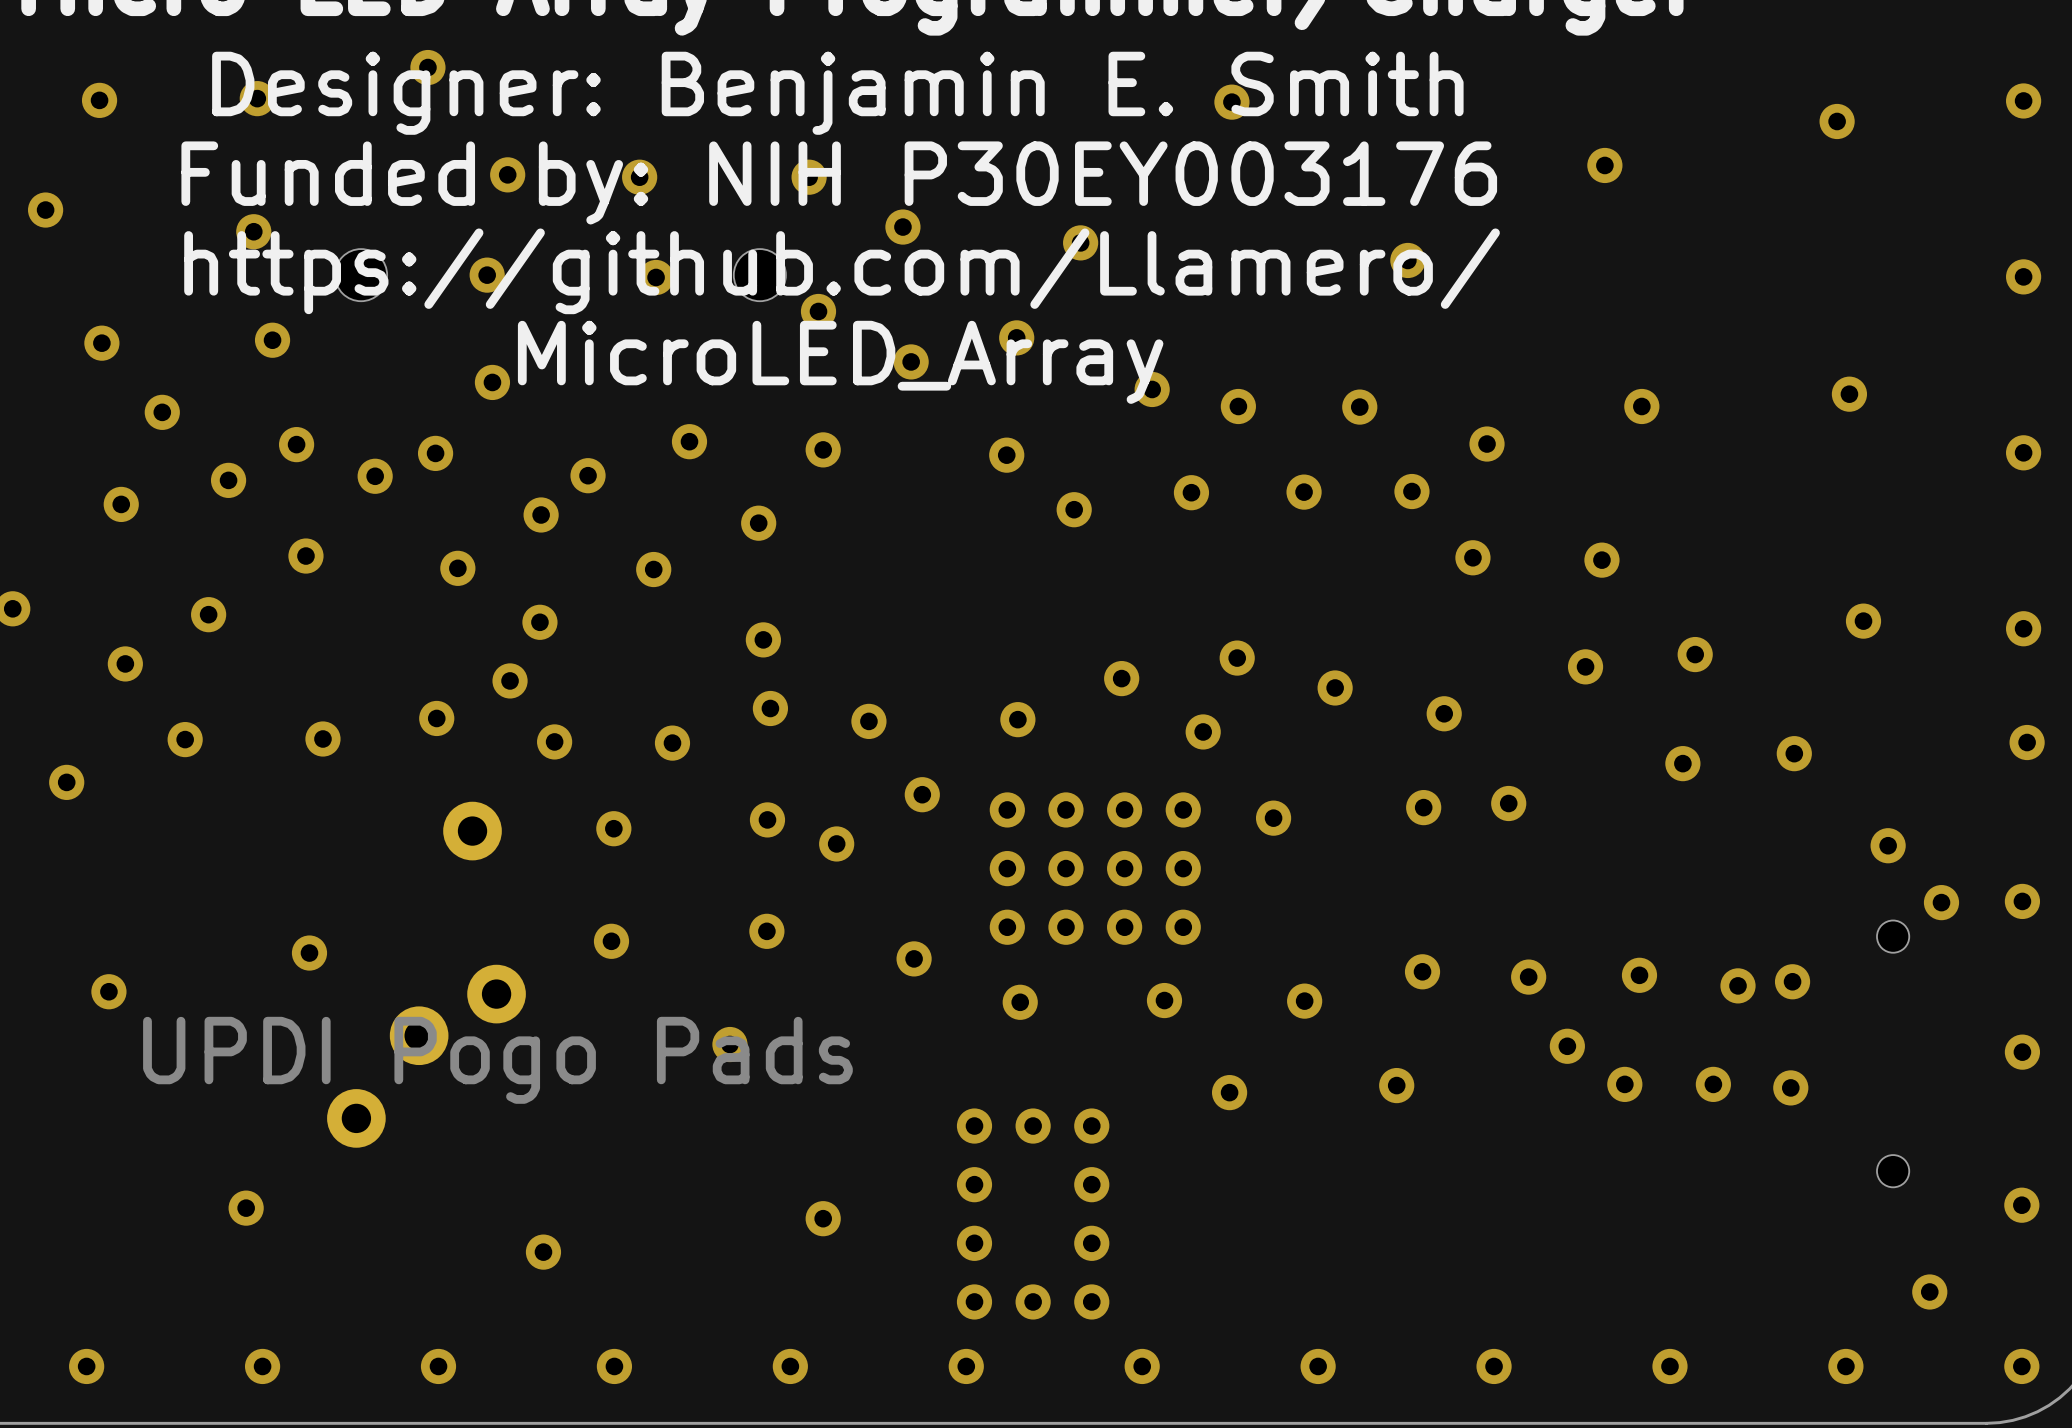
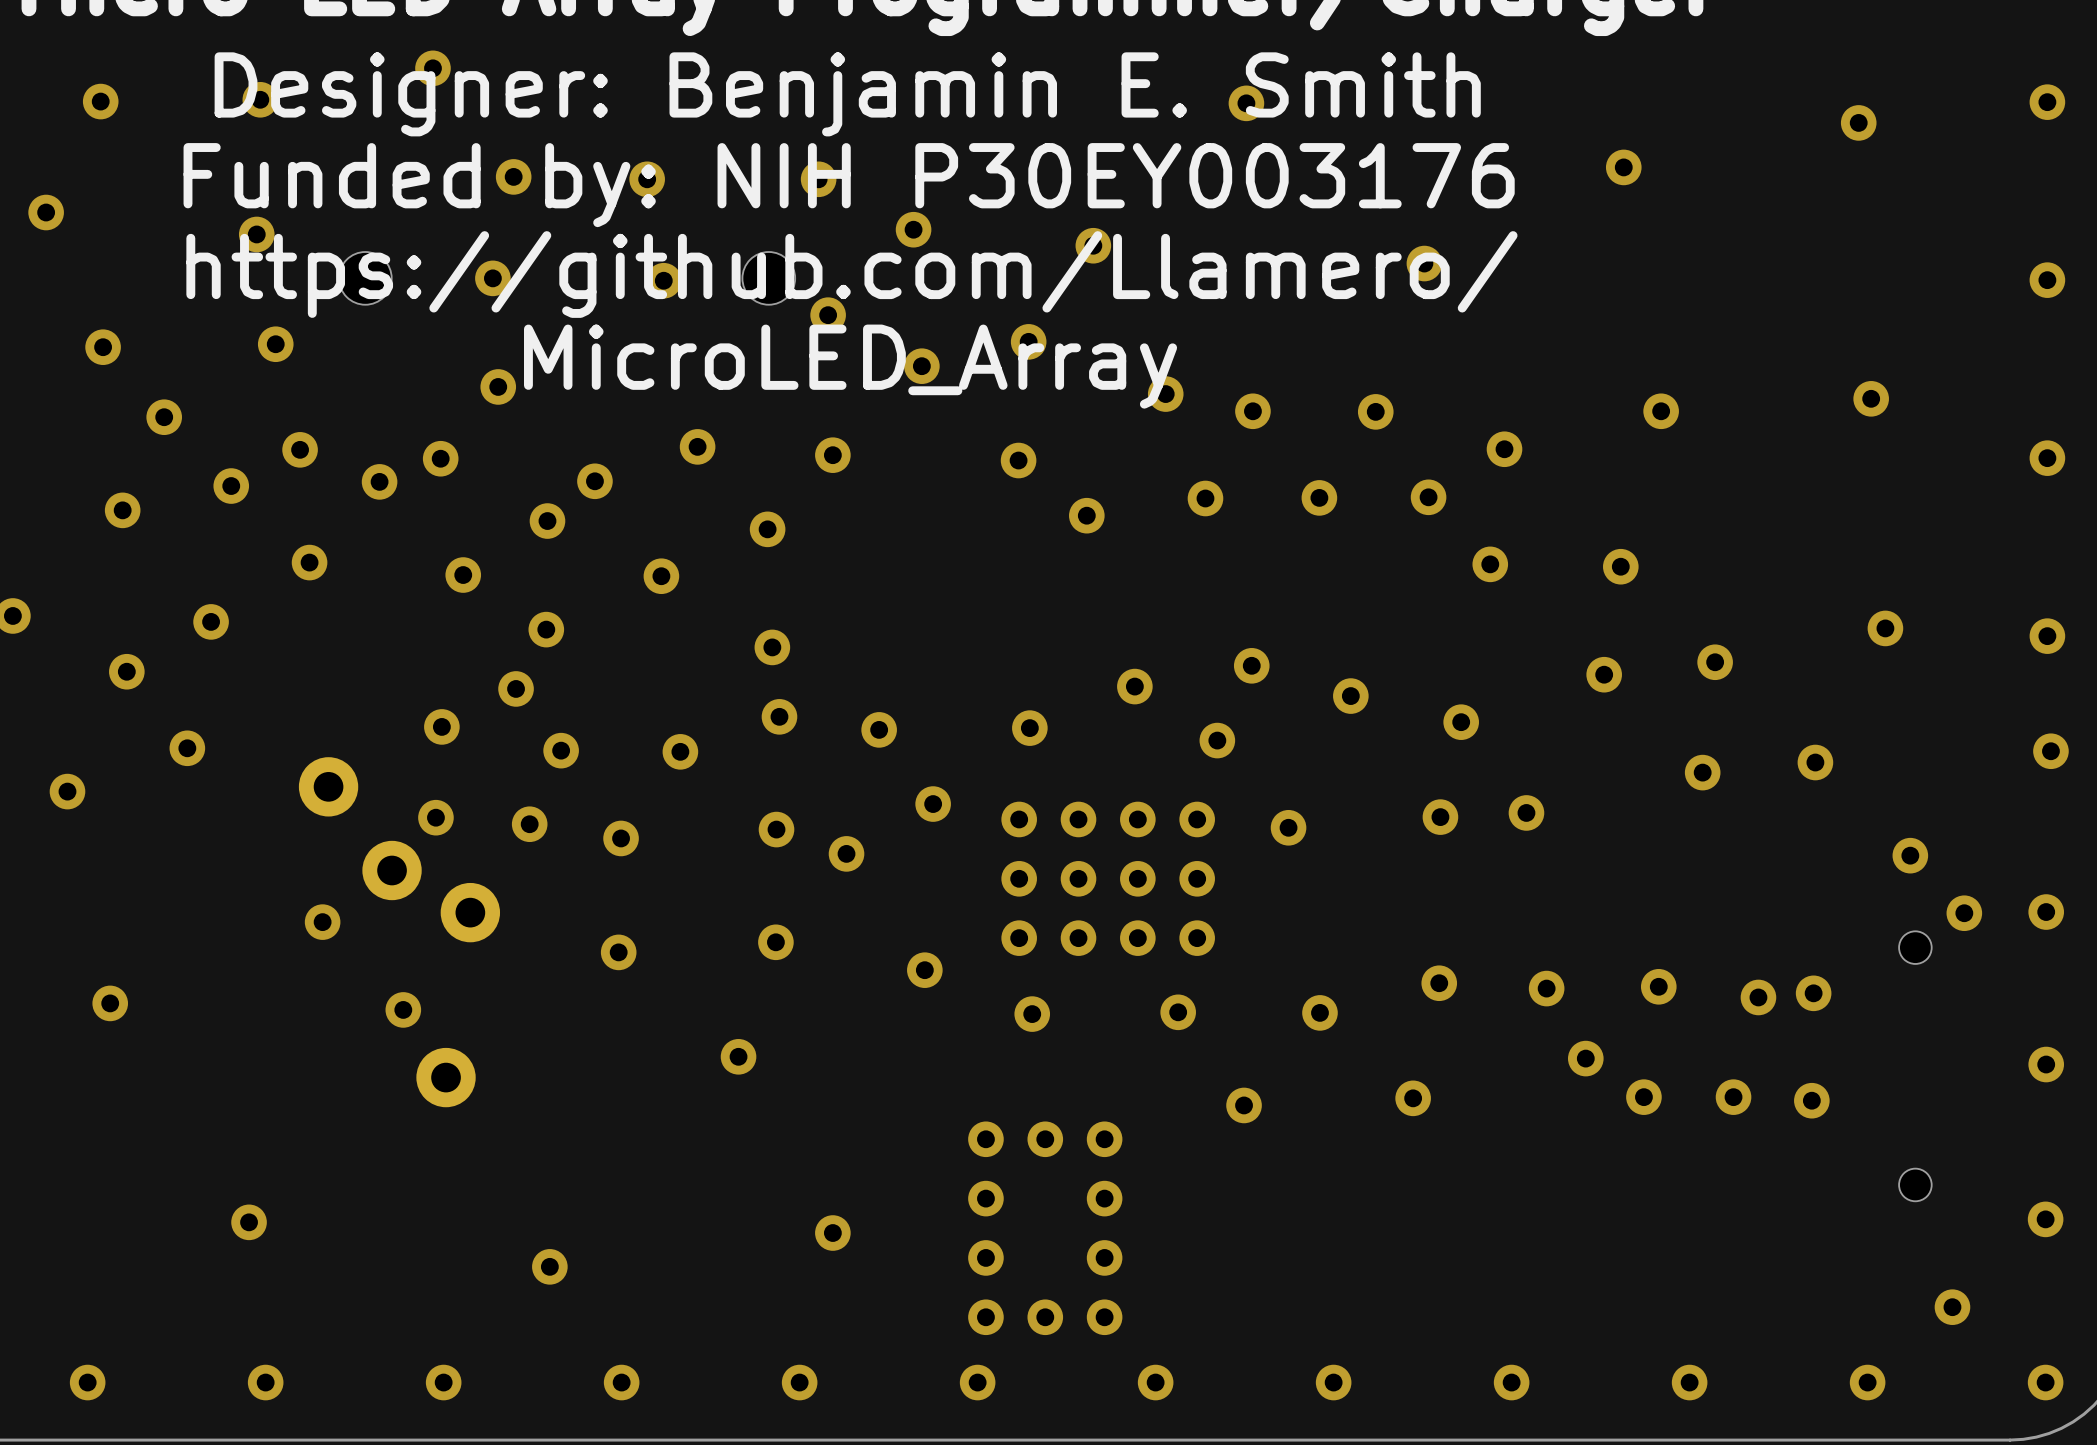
via: (322, 738) -> none
via: none -> (435, 817)
via: none -> (529, 824)
via position: (309, 953) -> (322, 922)
part side: bottom (426, 974) -> top (399, 932)
via: none -> (403, 1009)

